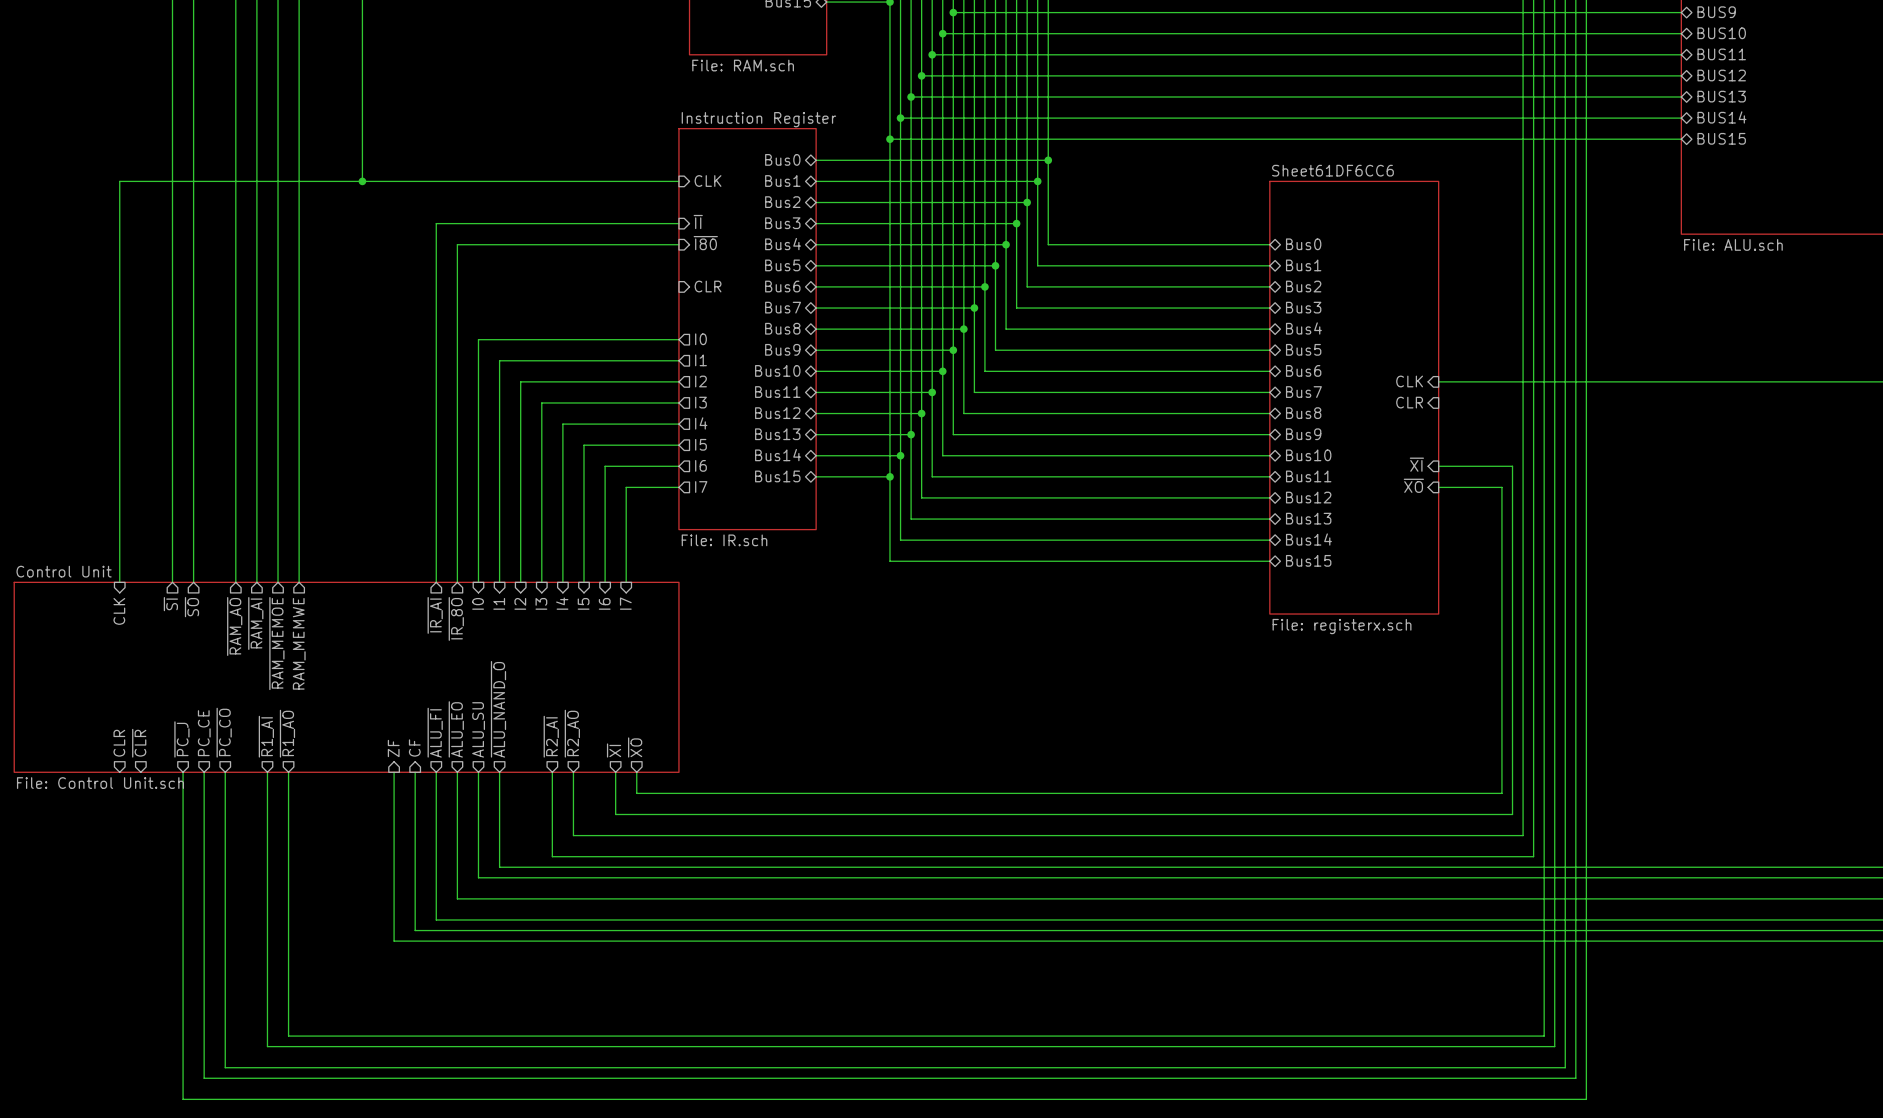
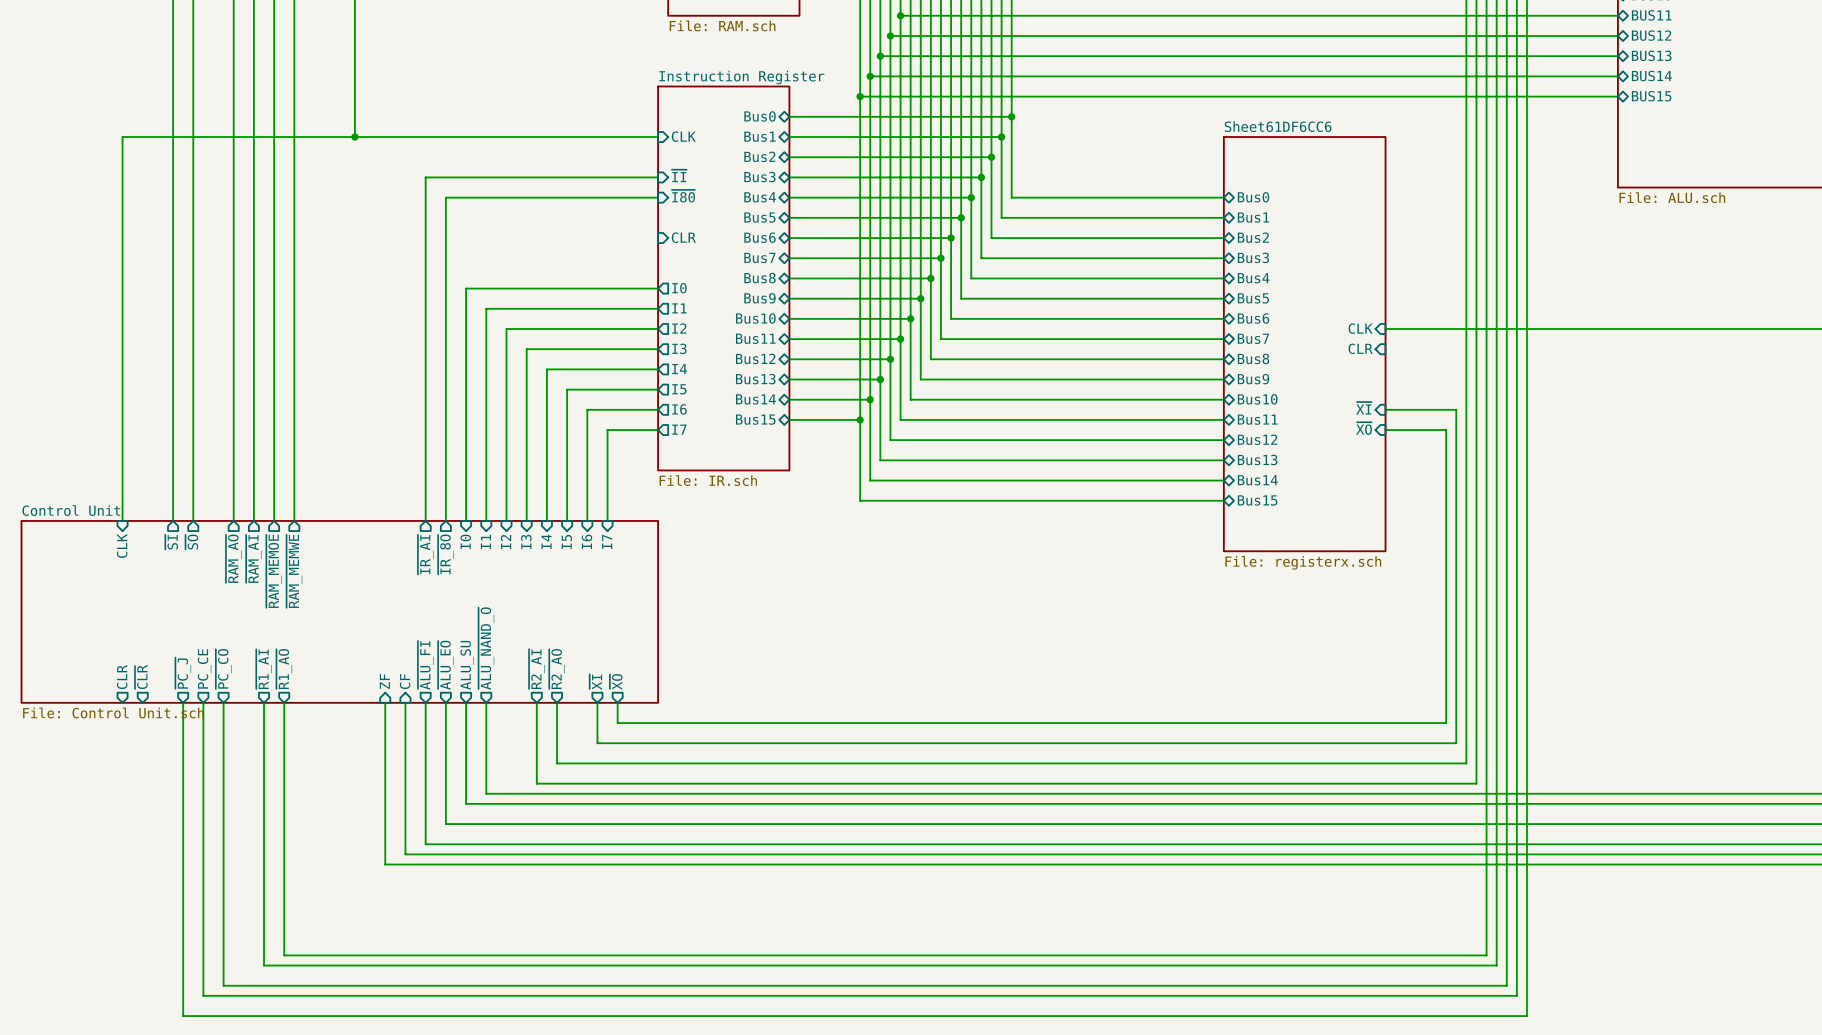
sheet pin: RAM_MEMWE (299, 643) -> ~{RAM_MEMWE} (294, 571)

